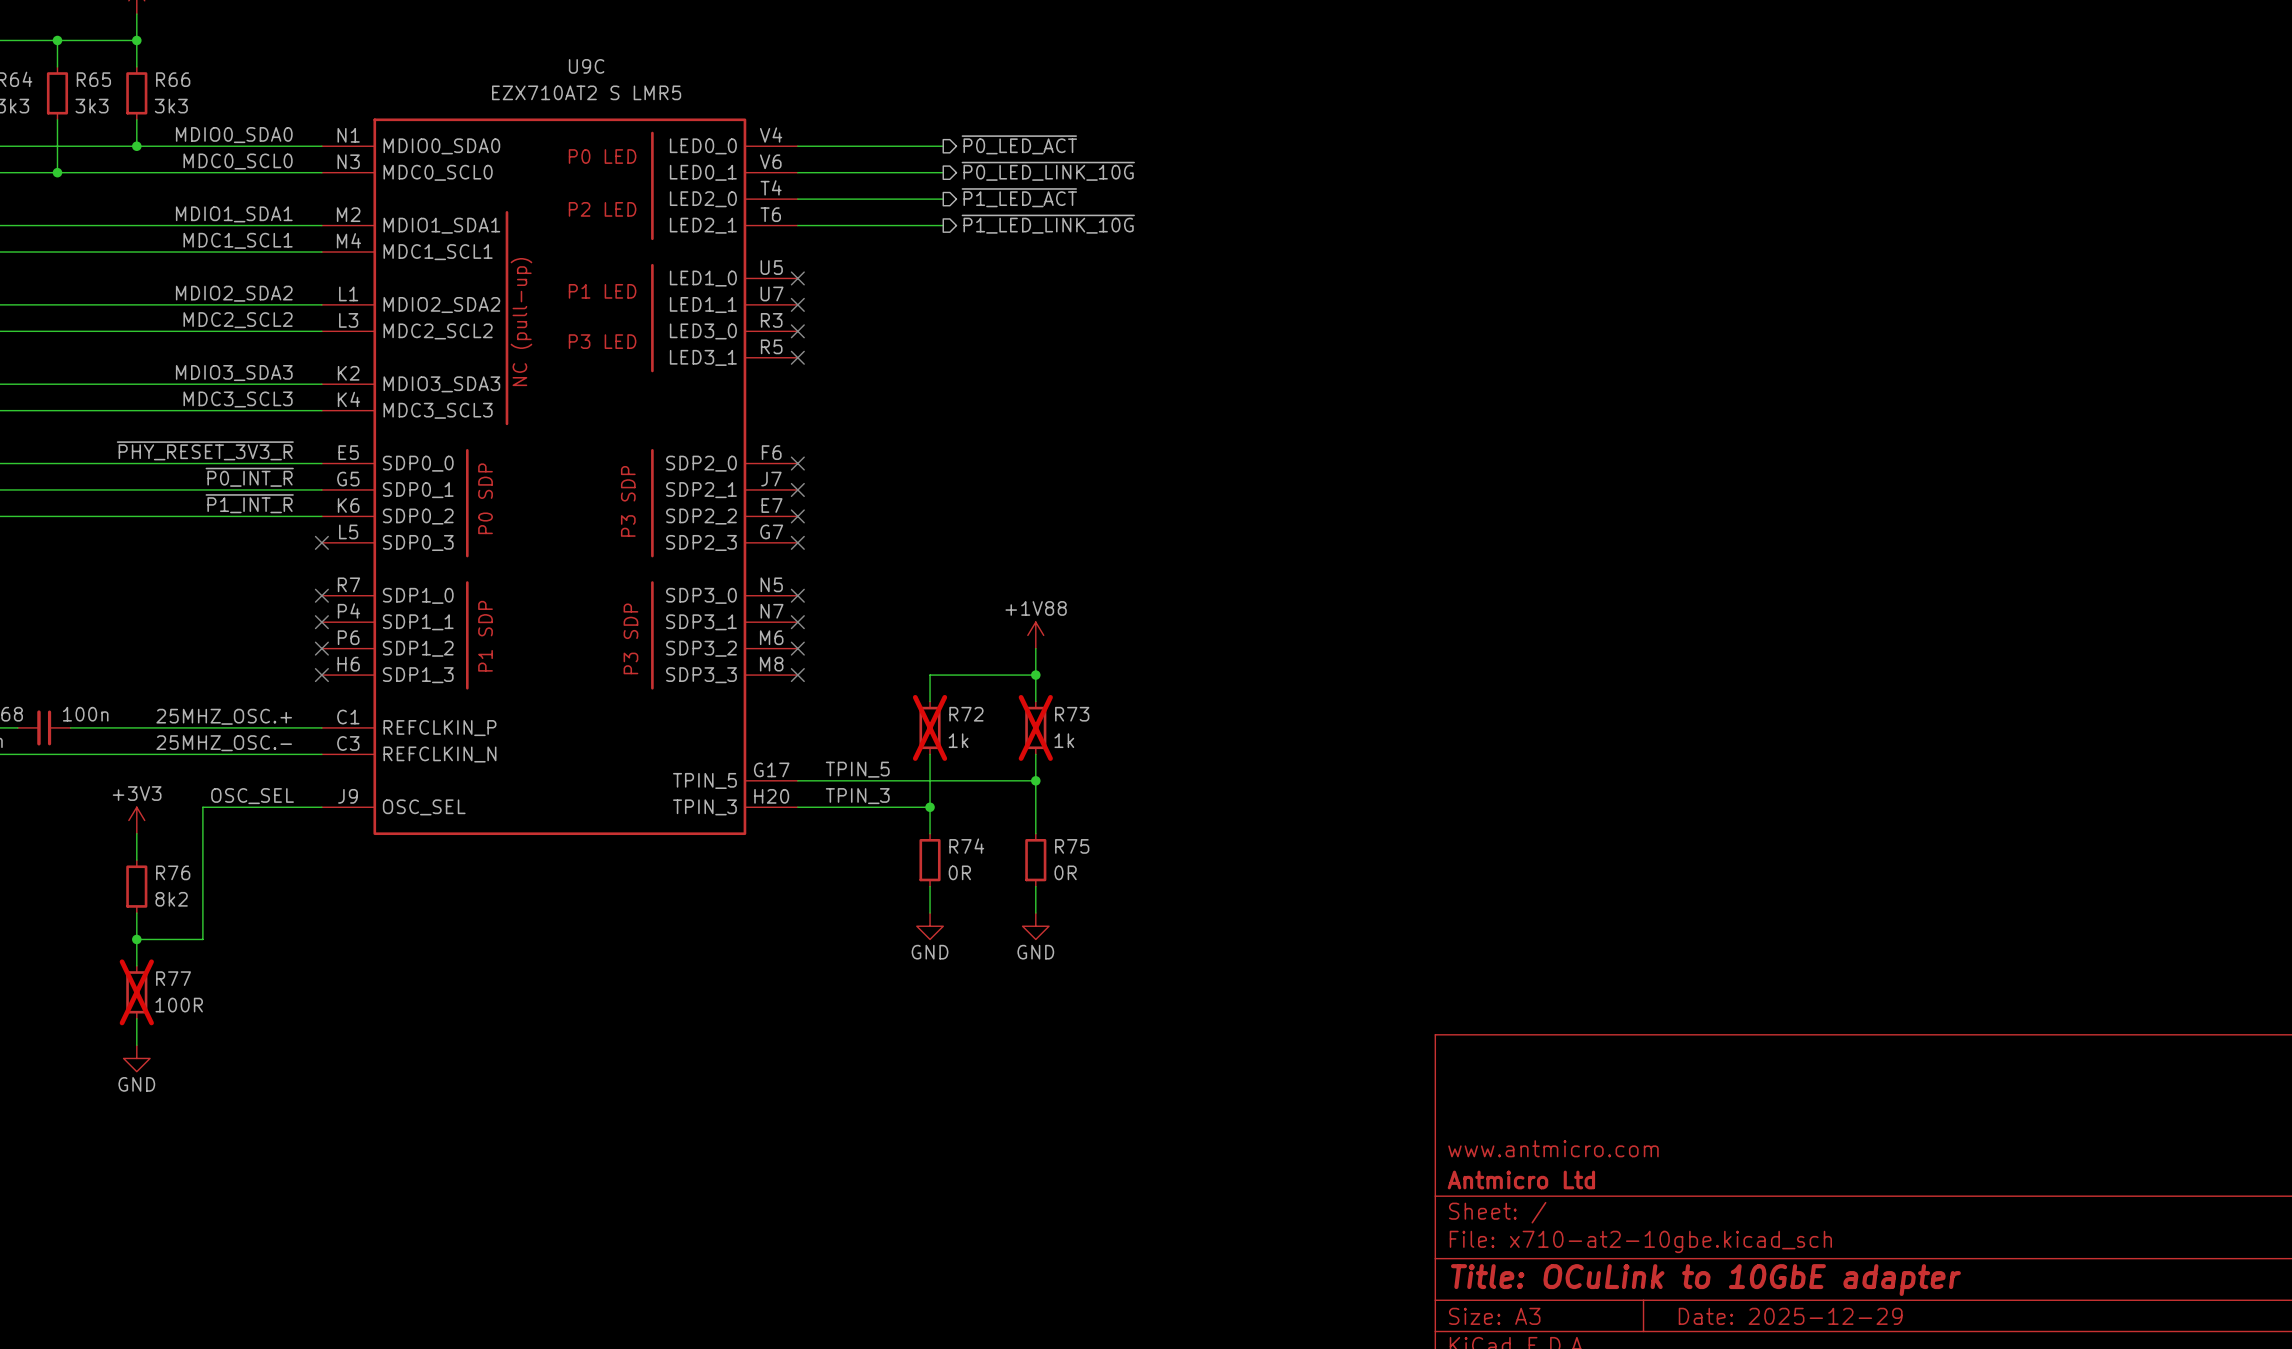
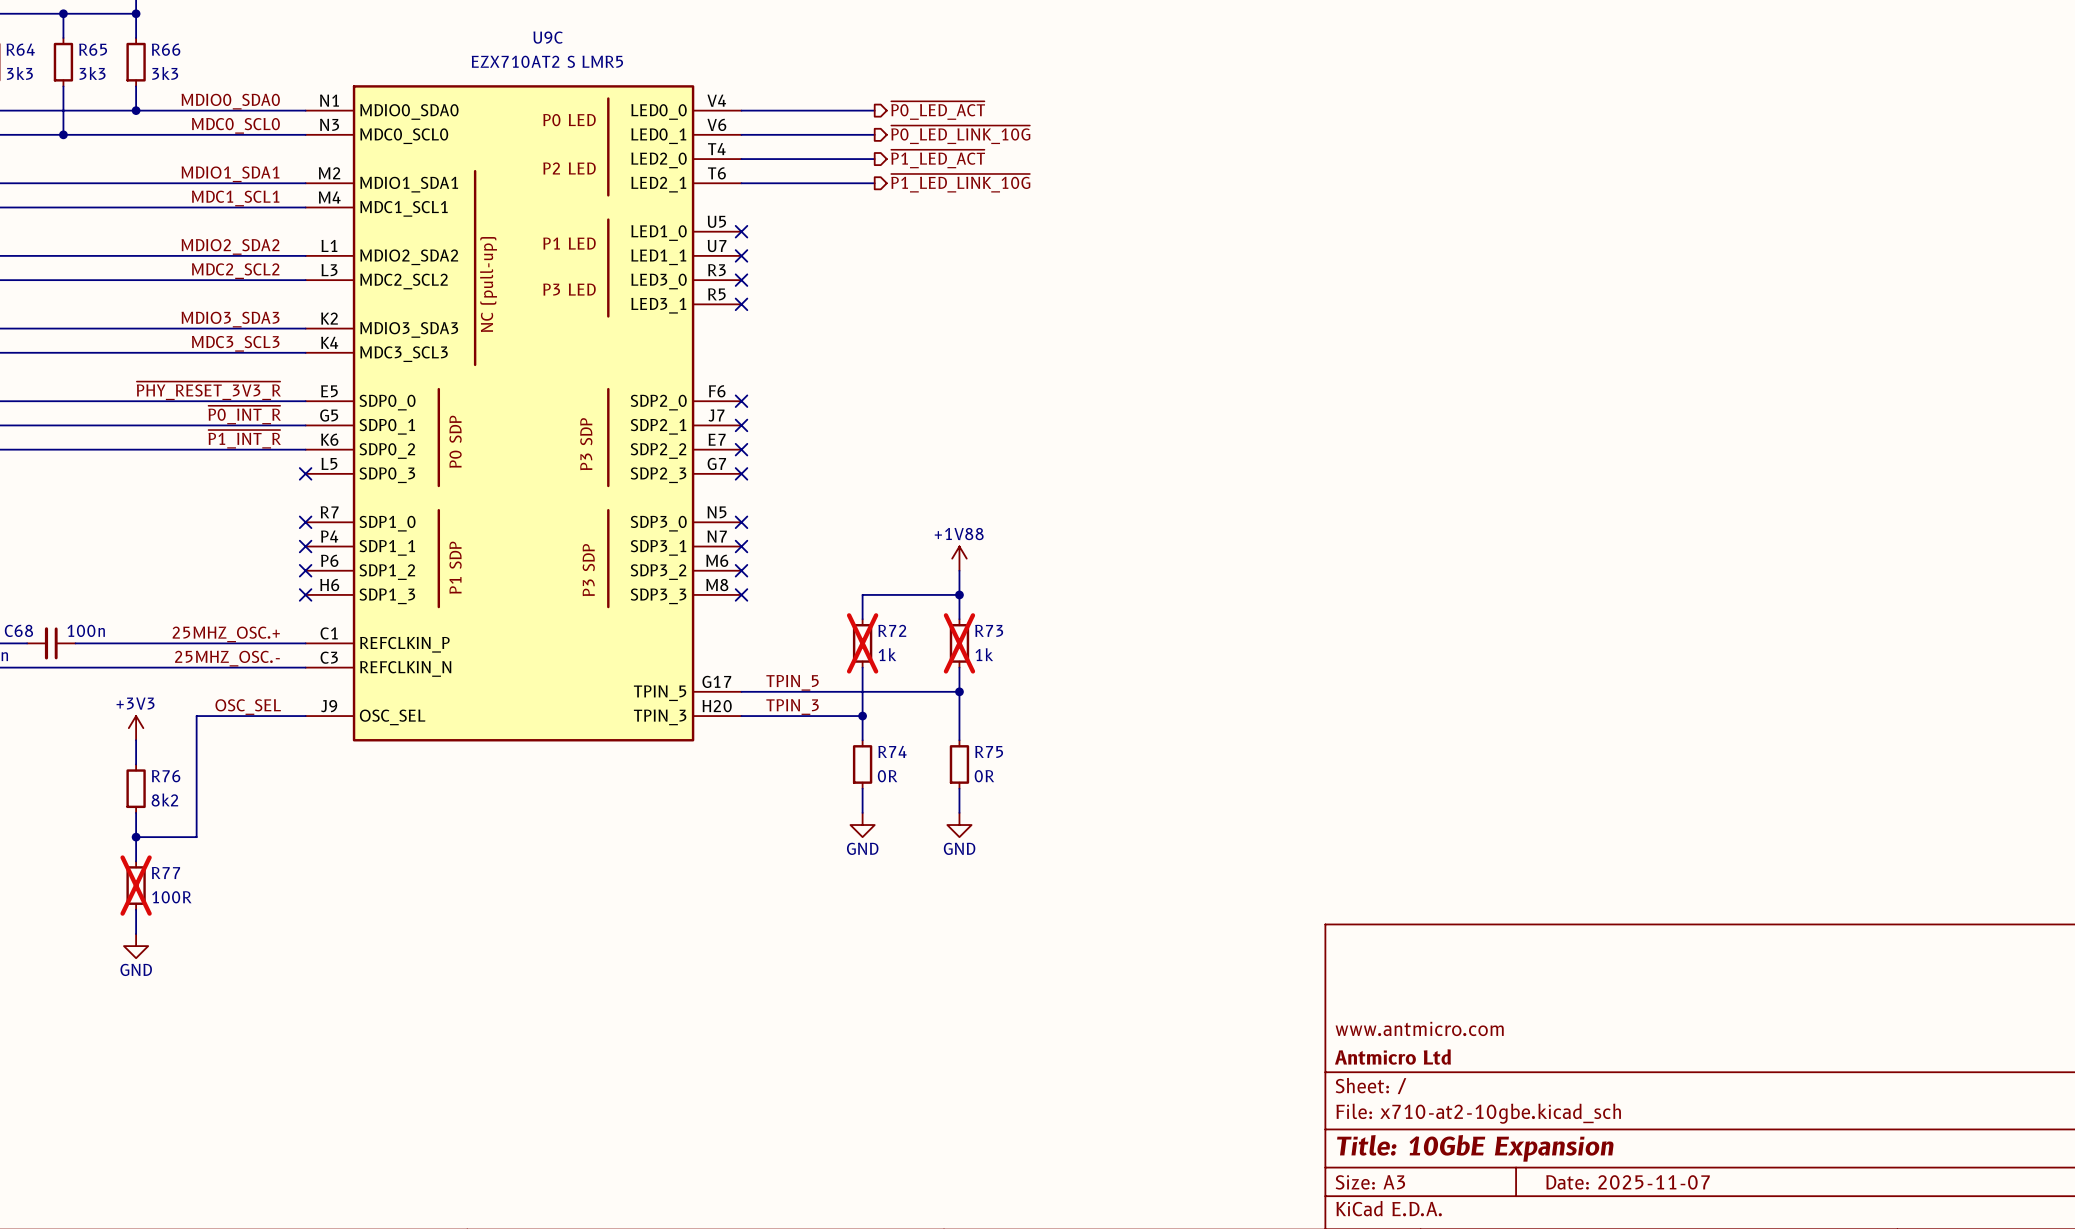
title block: Title: OCuLink to 10GbE adapter (1705, 1280) -> Title: 10GbE Expansion (1475, 1148)
title block: Date: 2025-12-29 (1790, 1316) -> Date: 2025-11-07 (1628, 1182)

